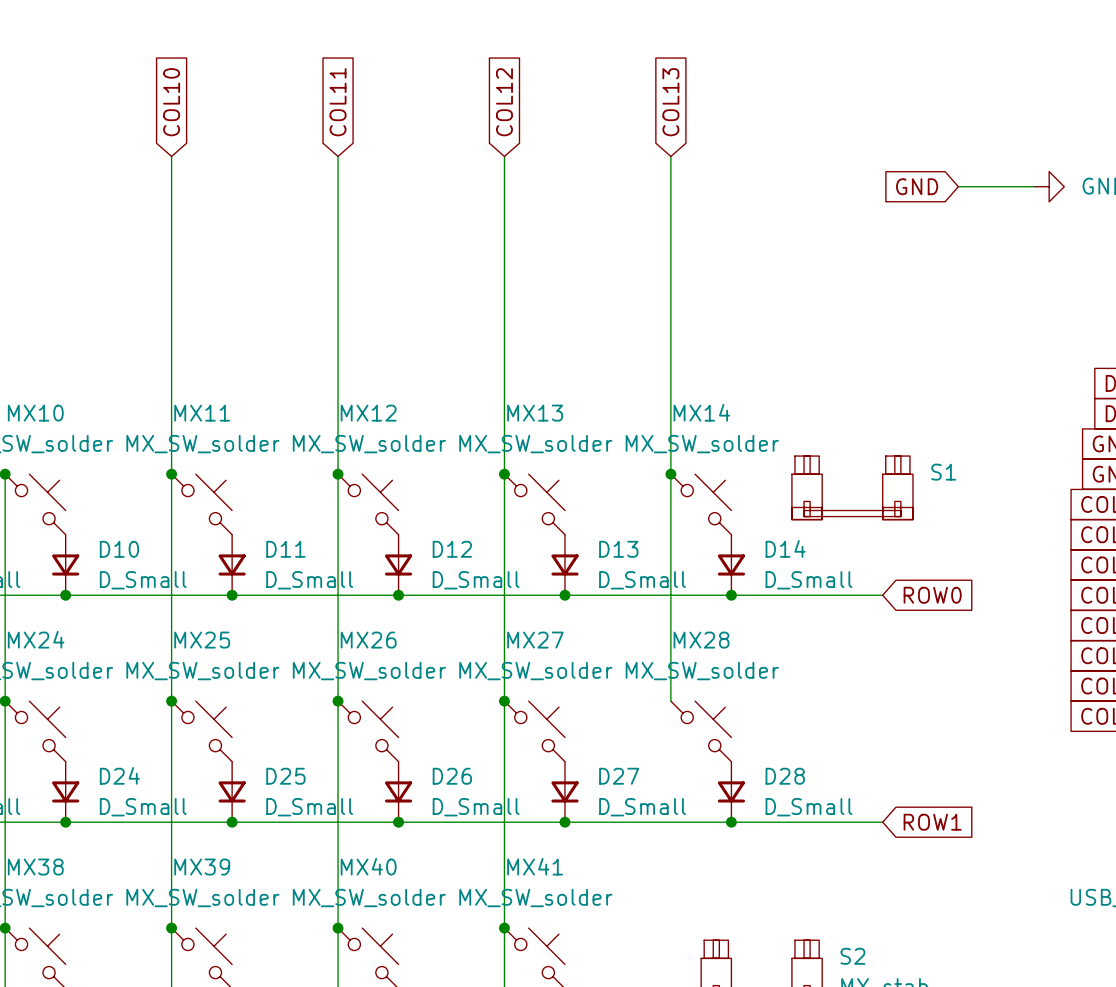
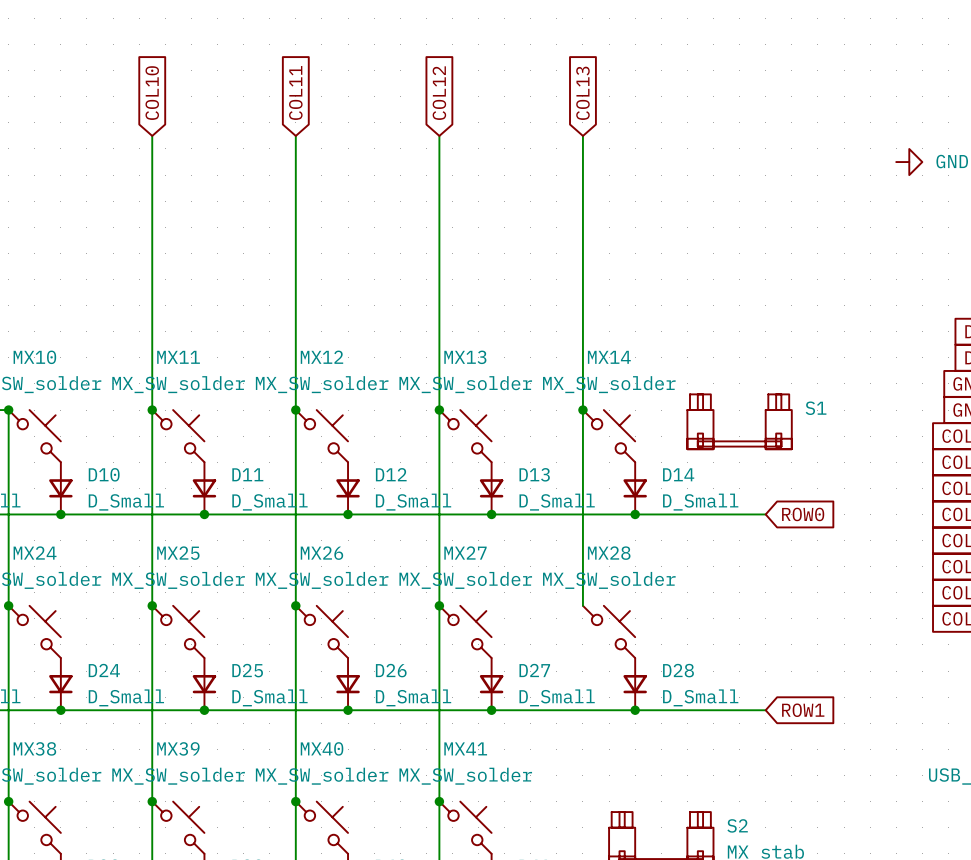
global label: GND (917, 186) -> none
wire: (958, 186) (1034, 186) -> none

